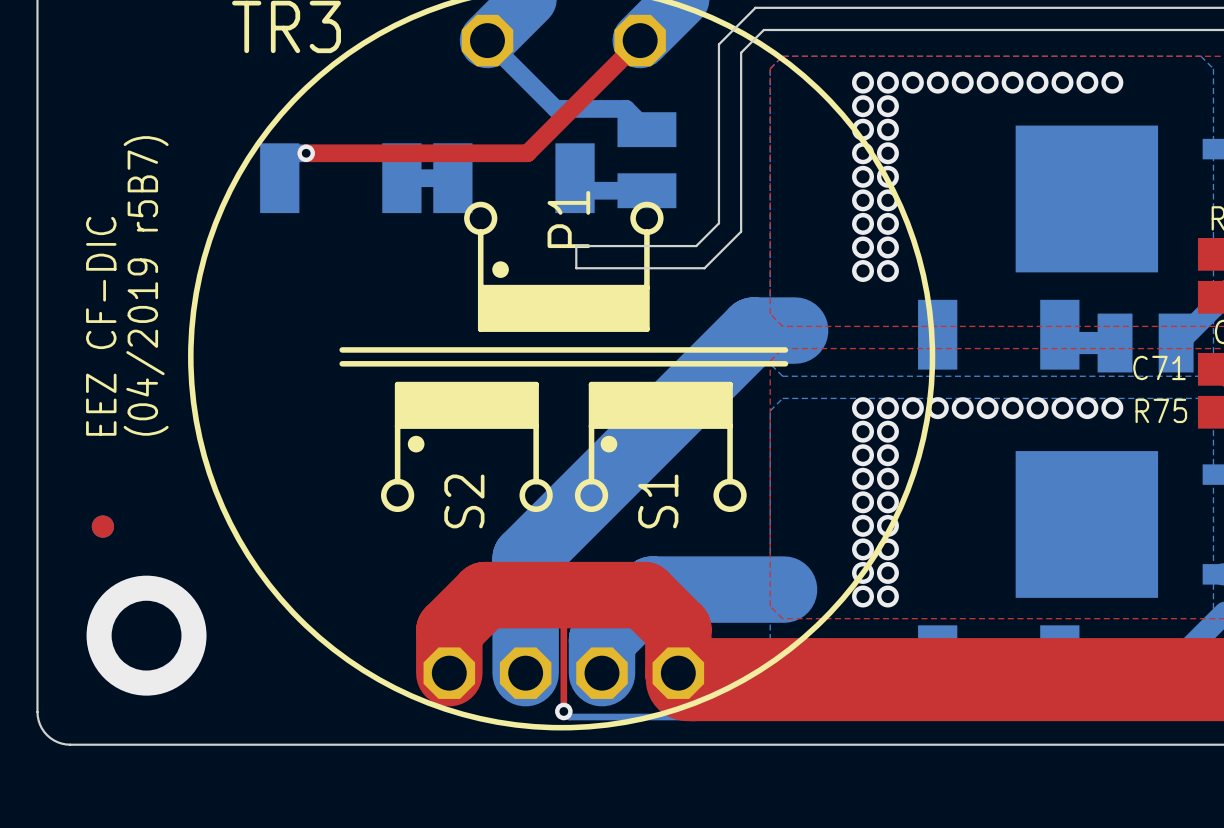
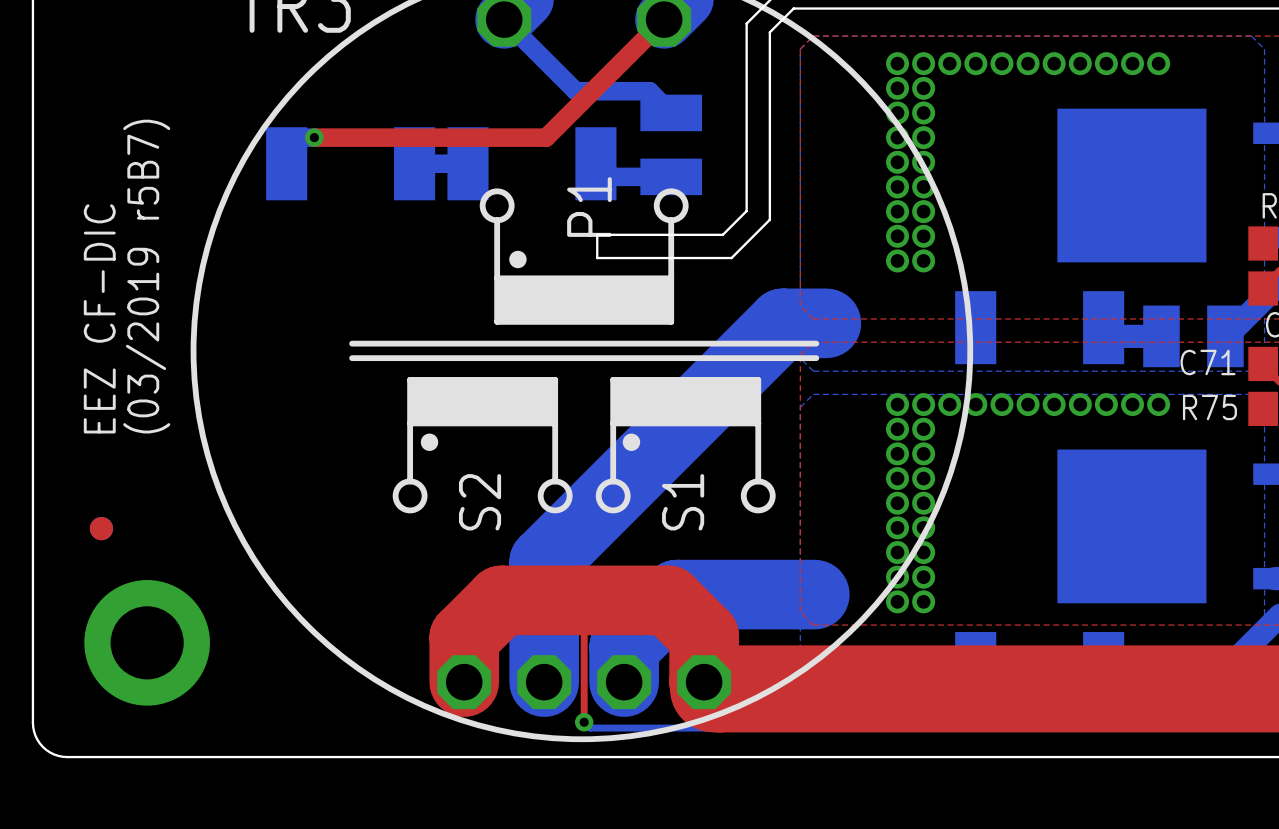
text: (04/2019 r5B7) (146, 285) -> (03/2019 r5B7) (146, 276)

